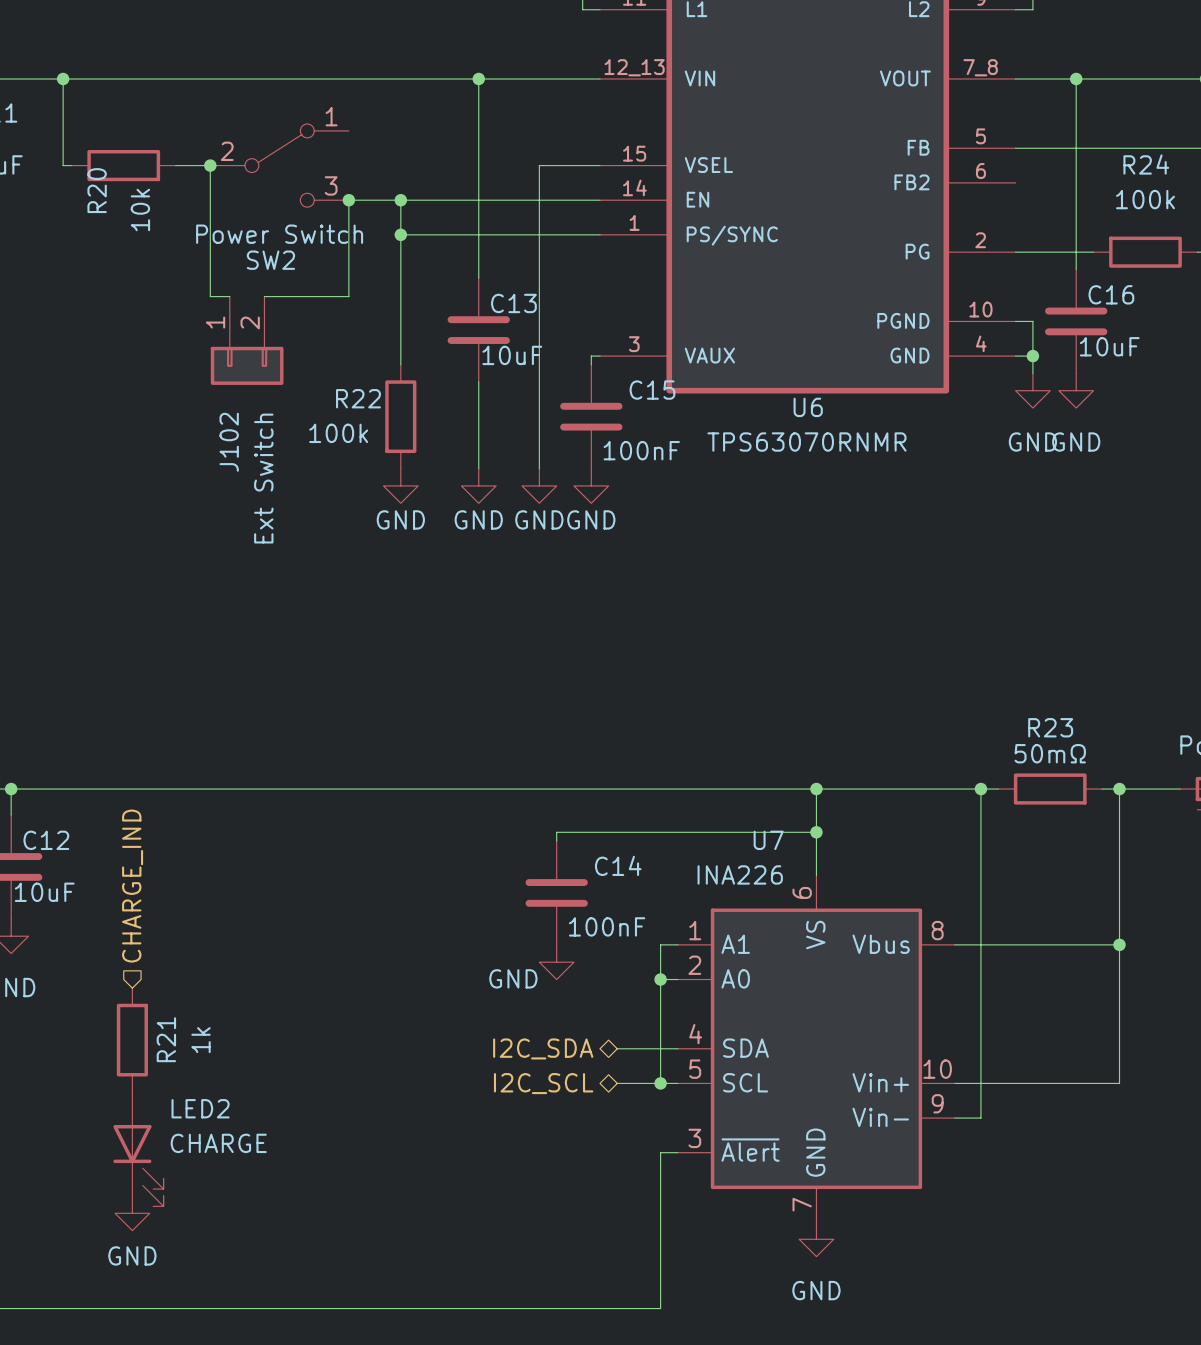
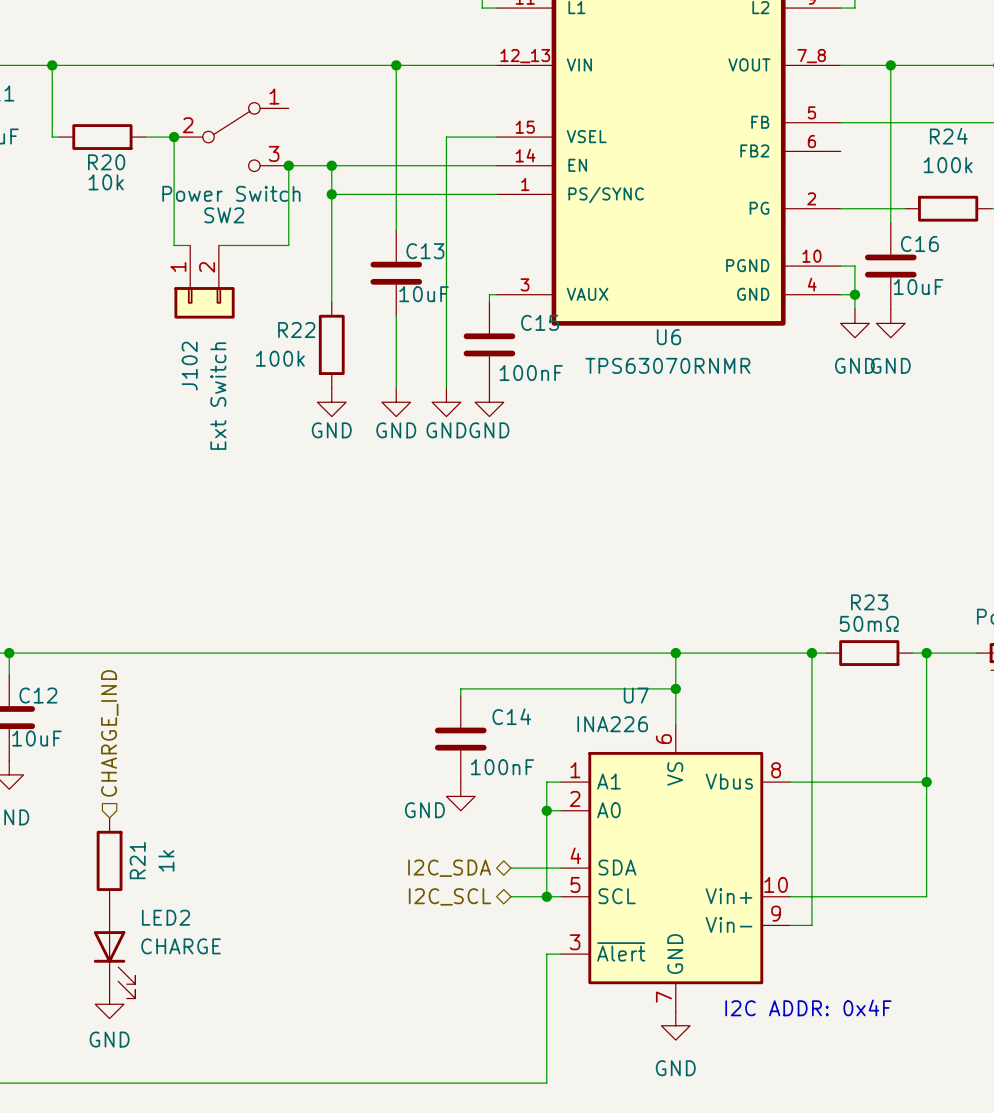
R20 name rotation: 0° (97, 190) -> 90° clockwise (106, 162)
R20 value rotation: 0° (140, 209) -> 90° clockwise (106, 182)
text: none -> I2C ADDR: 0x4F (808, 1007)

